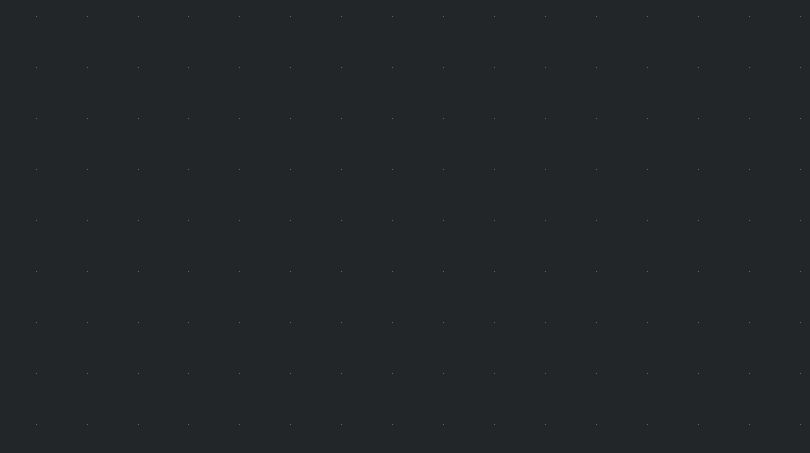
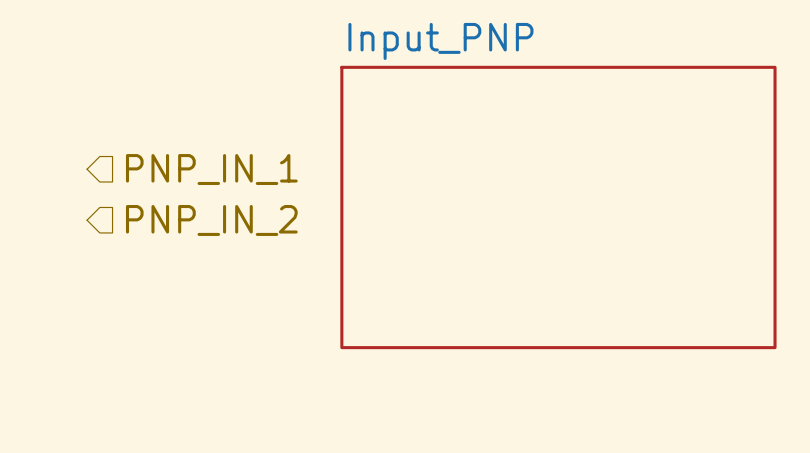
hierarchical label: none -> PNP_IN_1 (211, 169)
sheet Input_PNP: none -> (558, 207)
hierarchical label: none -> PNP_IN_2 (211, 220)

